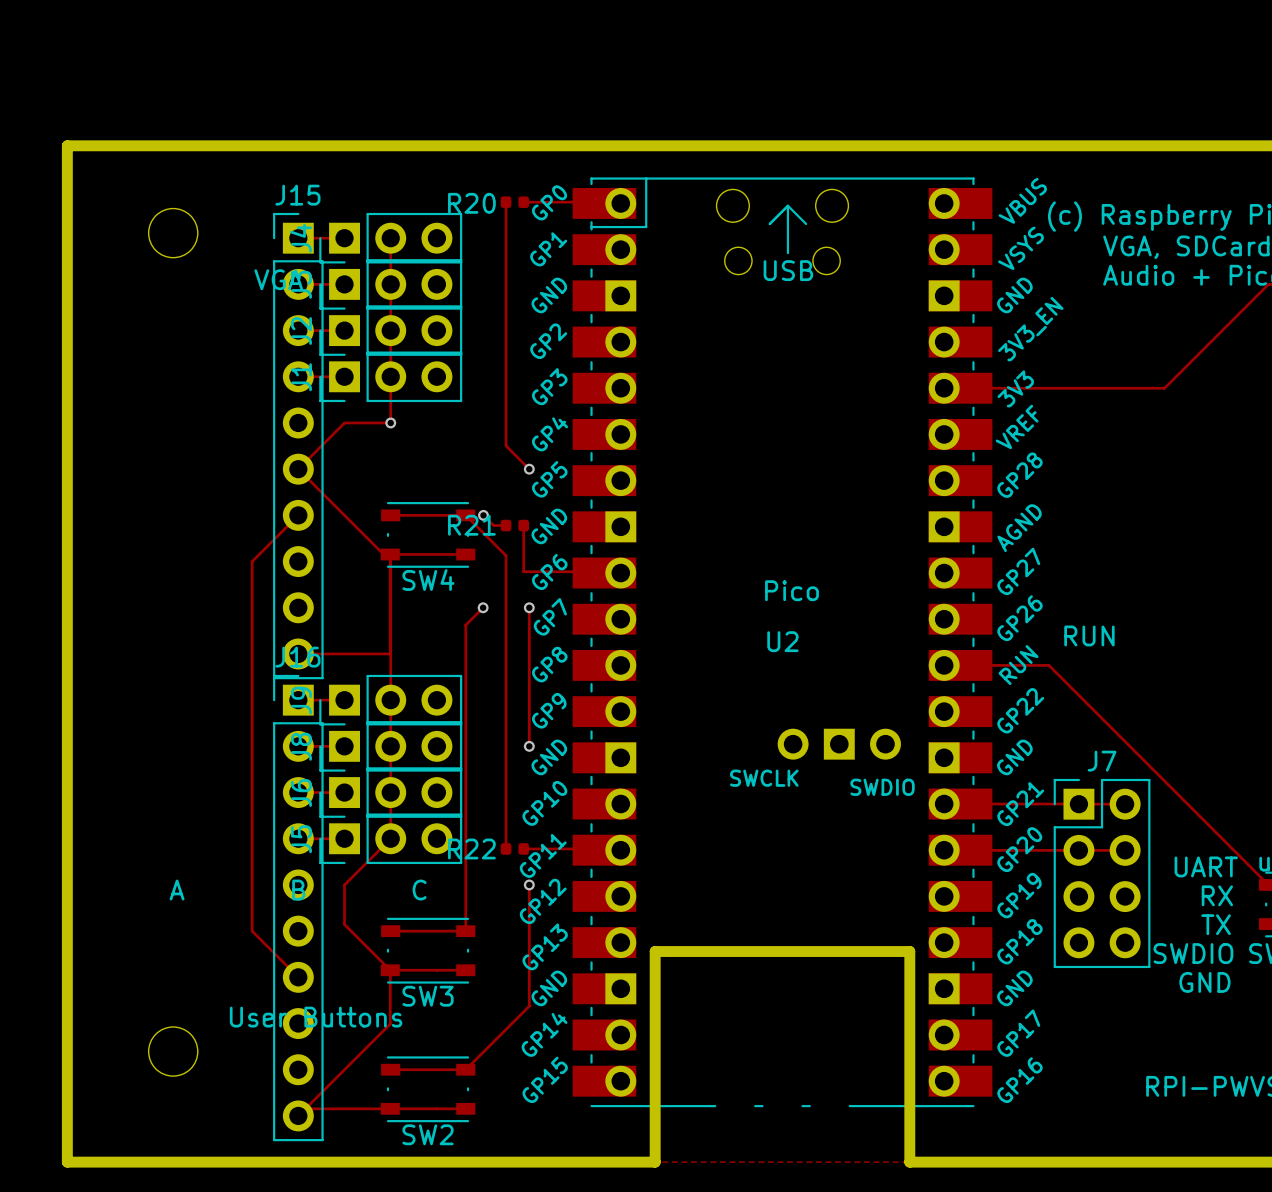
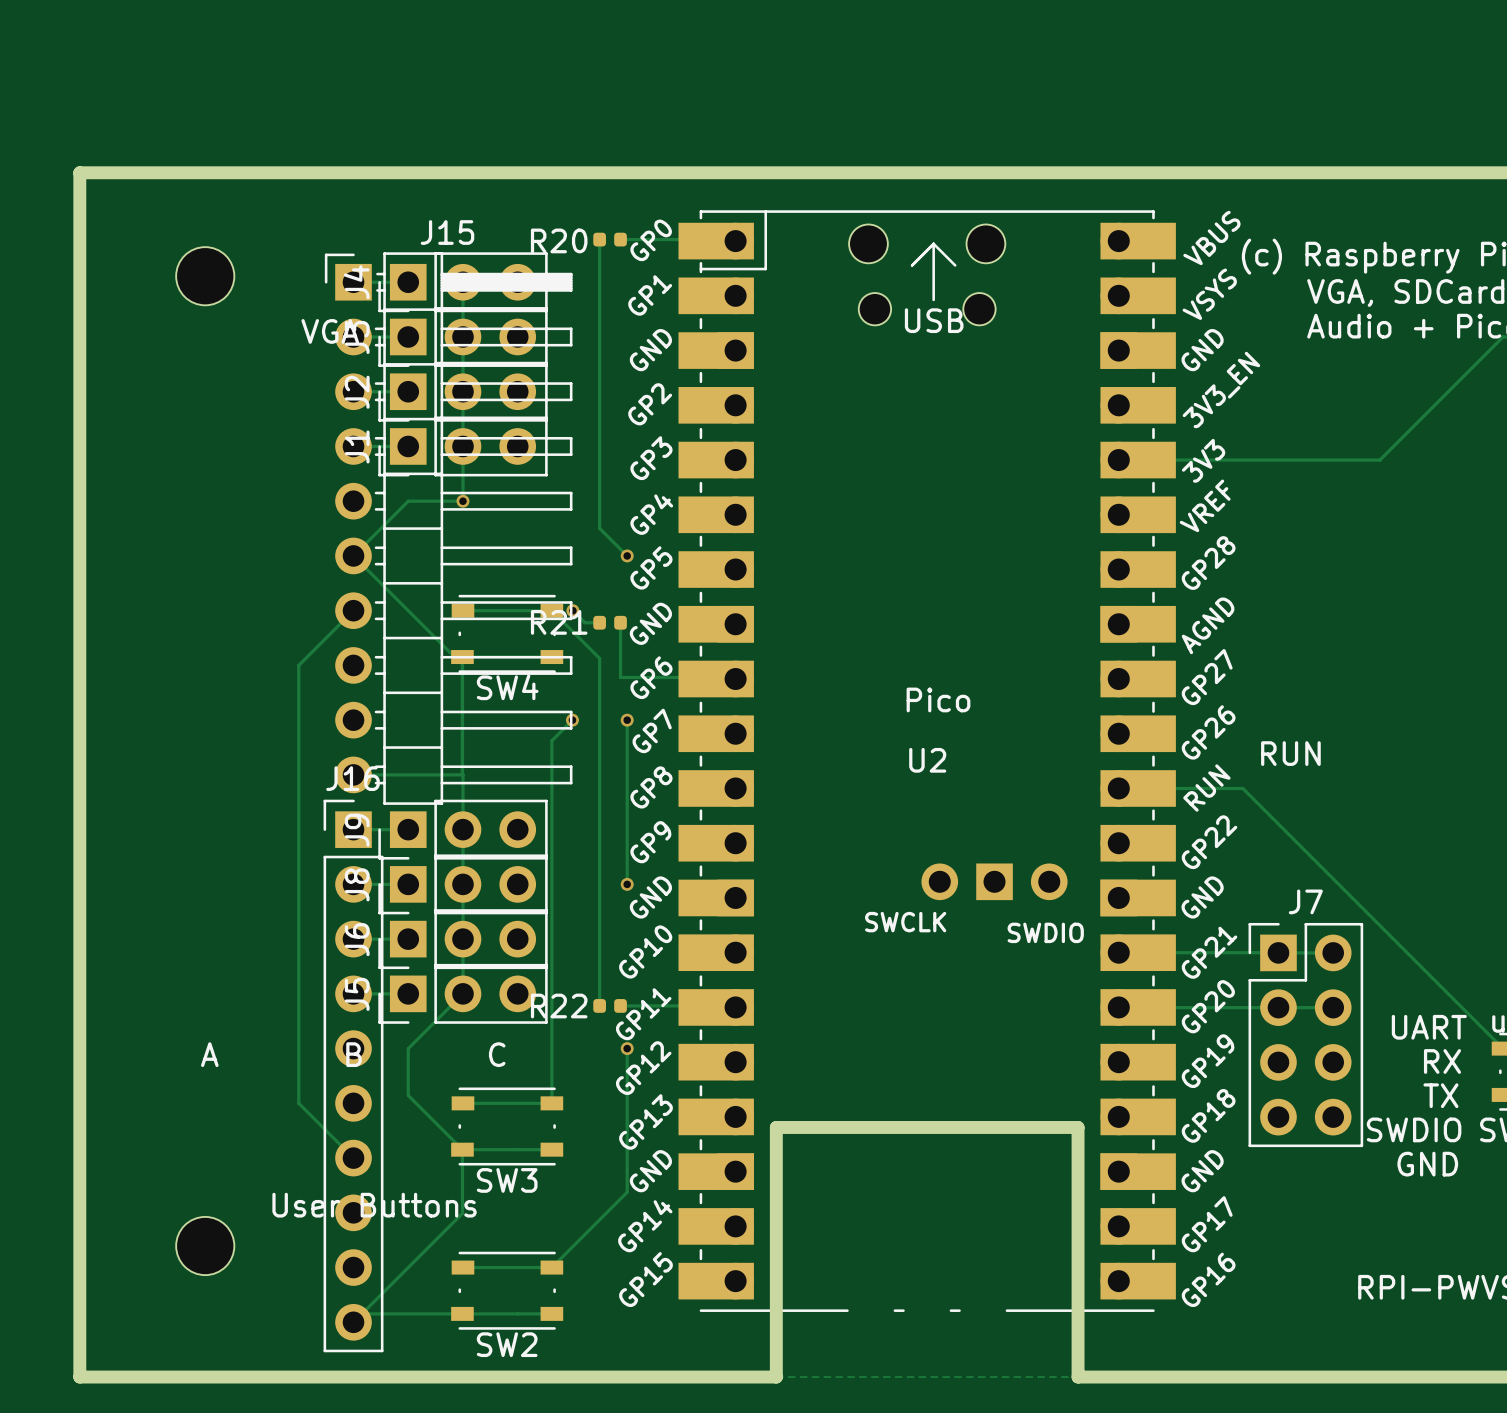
J15 footprint: [273, 212, 324, 680] -> [324, 252, 573, 805]

